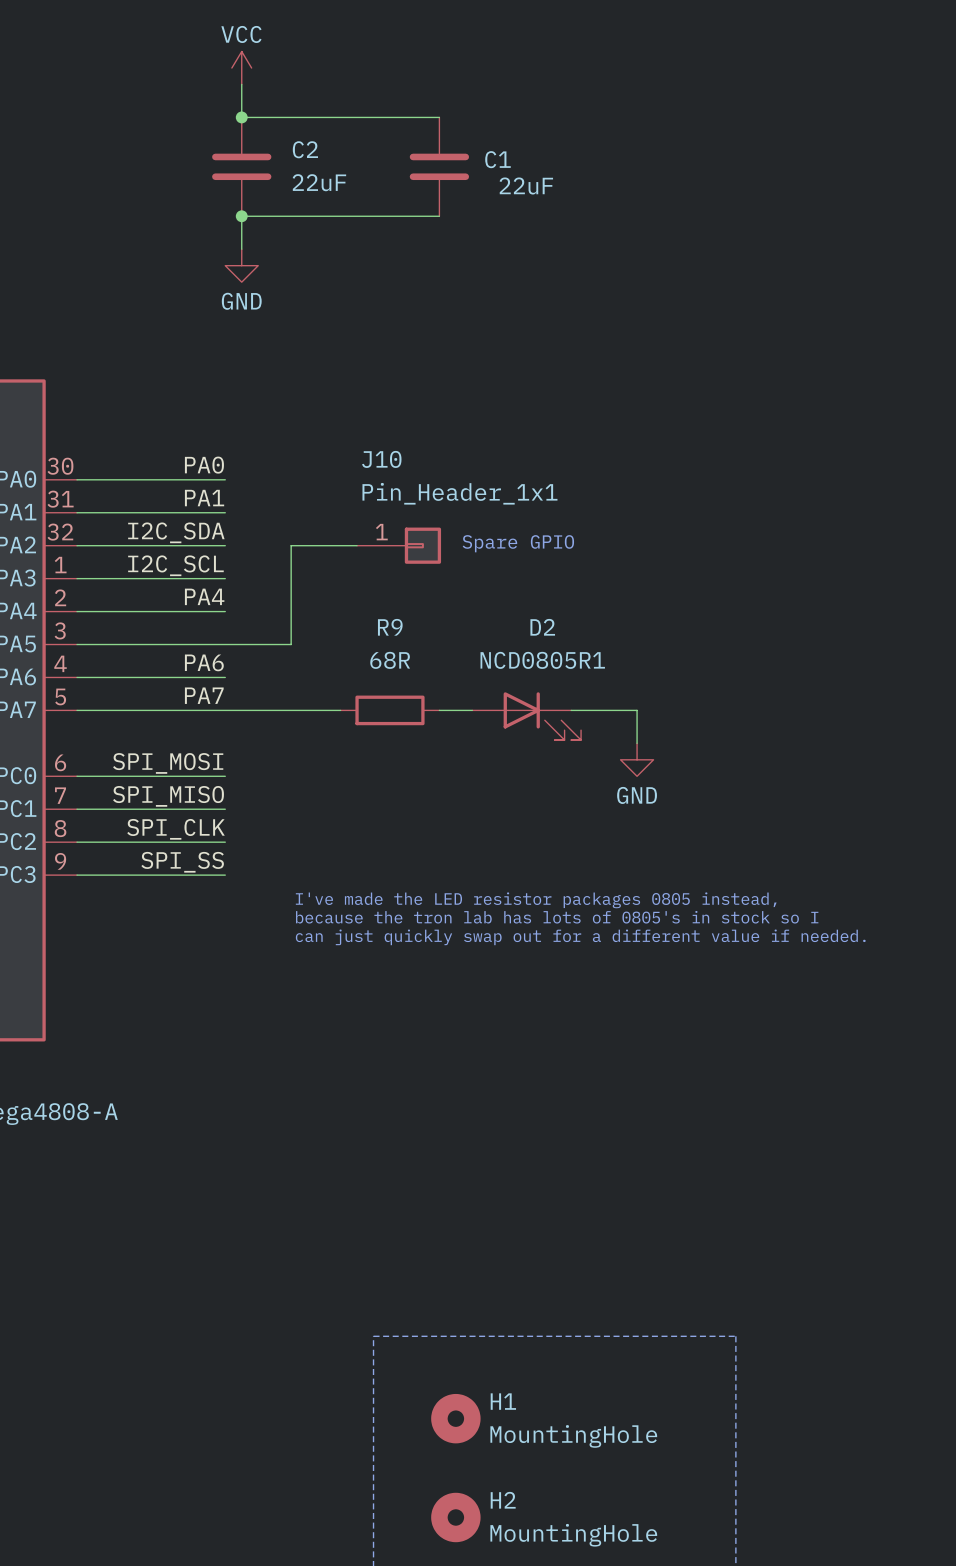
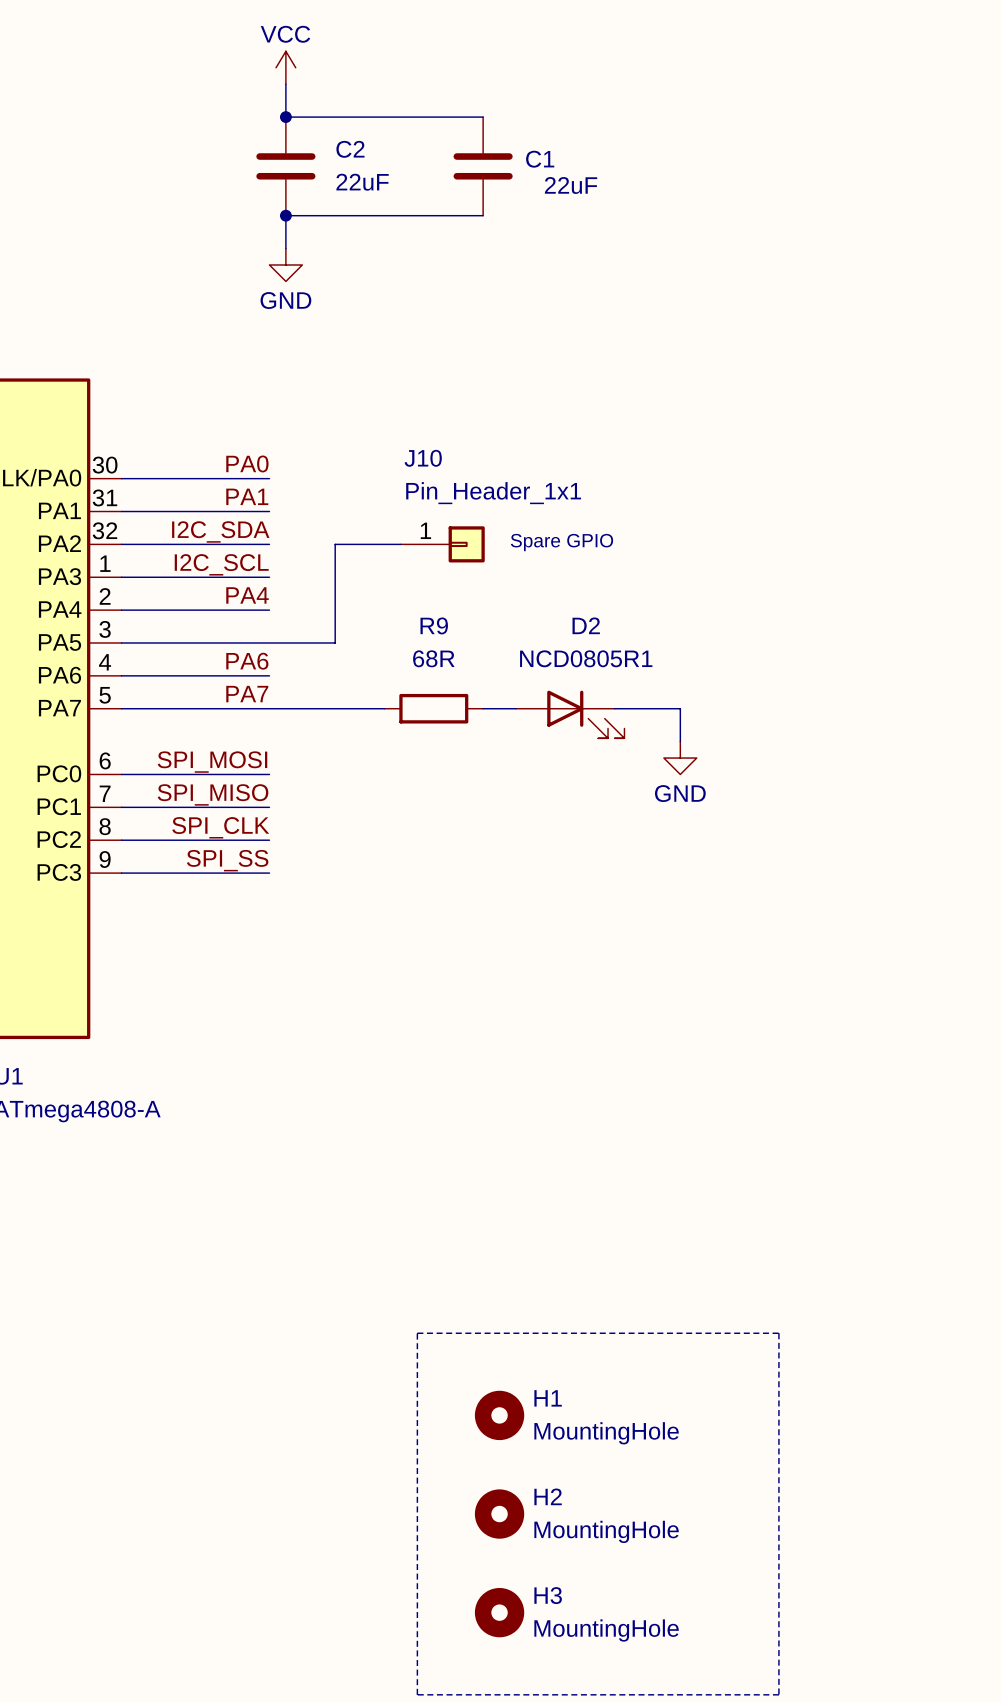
text: I've made the LED resistor packages 0805 instead, (536, 900) -> none
text: because the tron lab has lots of 0805's in stock so I (557, 917) -> none
text: can just quickly swap out for a different value if needed. (580, 937) -> none

